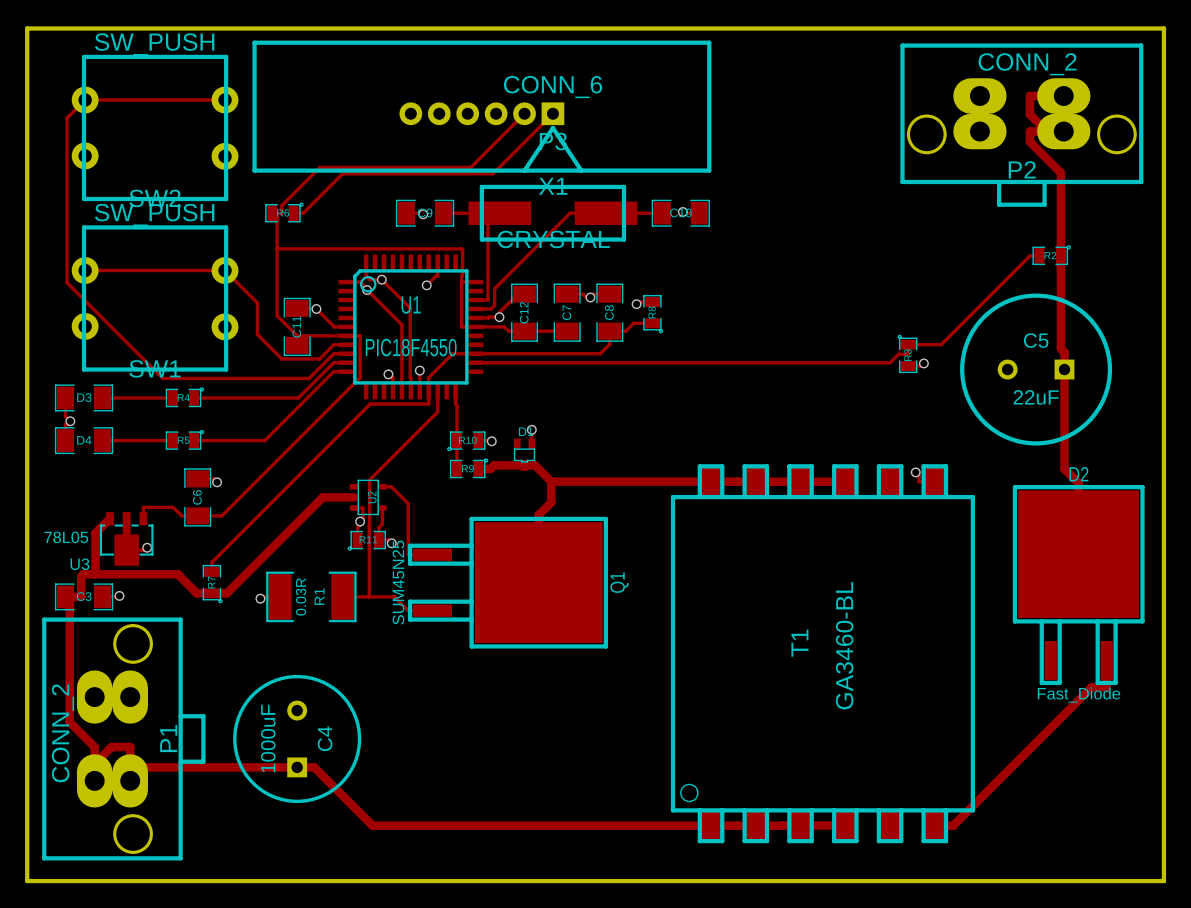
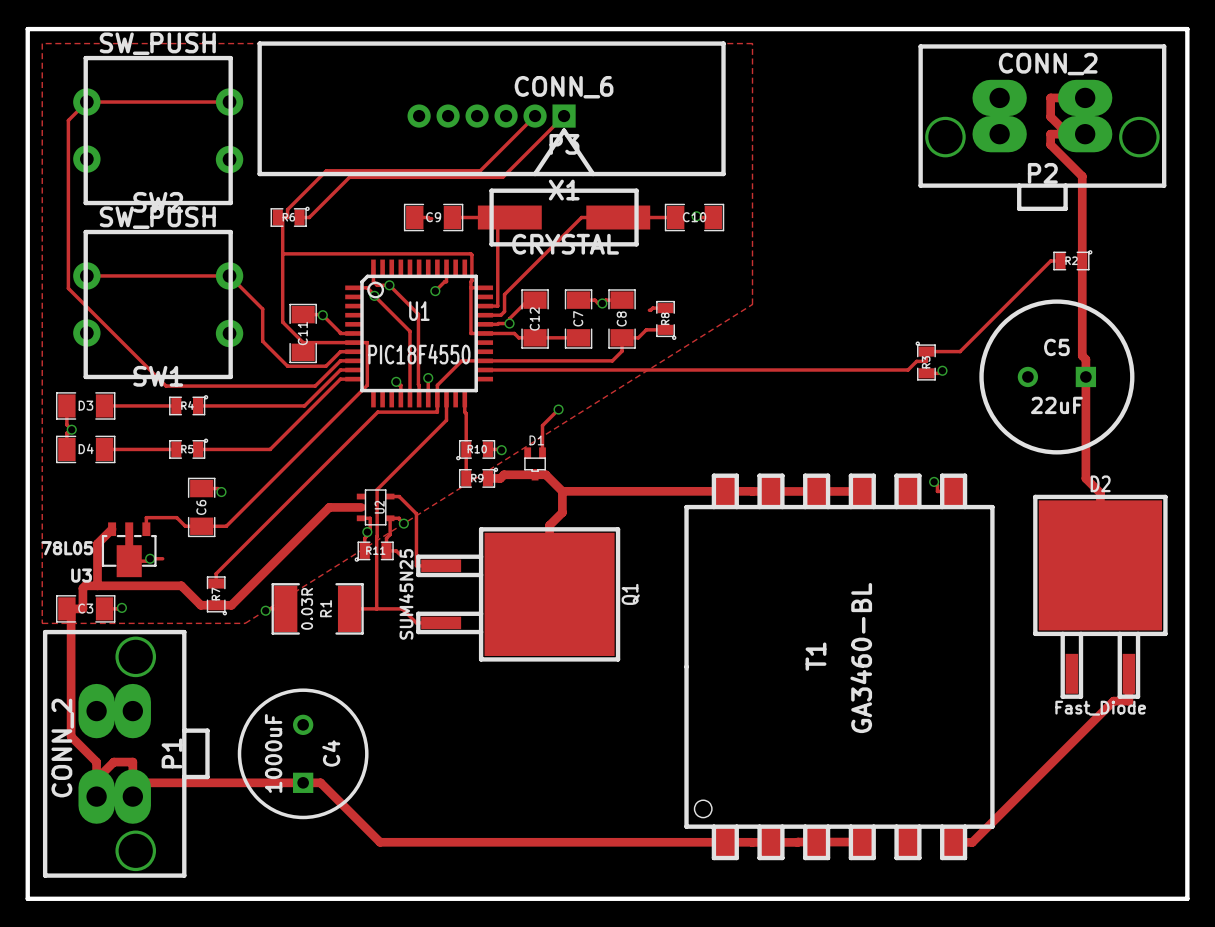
zone outline: none -> (42, 43) (752, 43) (752, 304) (245, 623) (42, 623) (42, 43)
via: (423, 214) -> none
via: (636, 304) -> none
track: none -> (558, 409) (542, 425) (542, 438)
via position: (531, 429) -> (558, 409)
track: none -> (390, 518) (399, 518) (403, 523)
via position: (391, 543) -> (403, 523)
track: none -> (150, 558) (162, 558)

